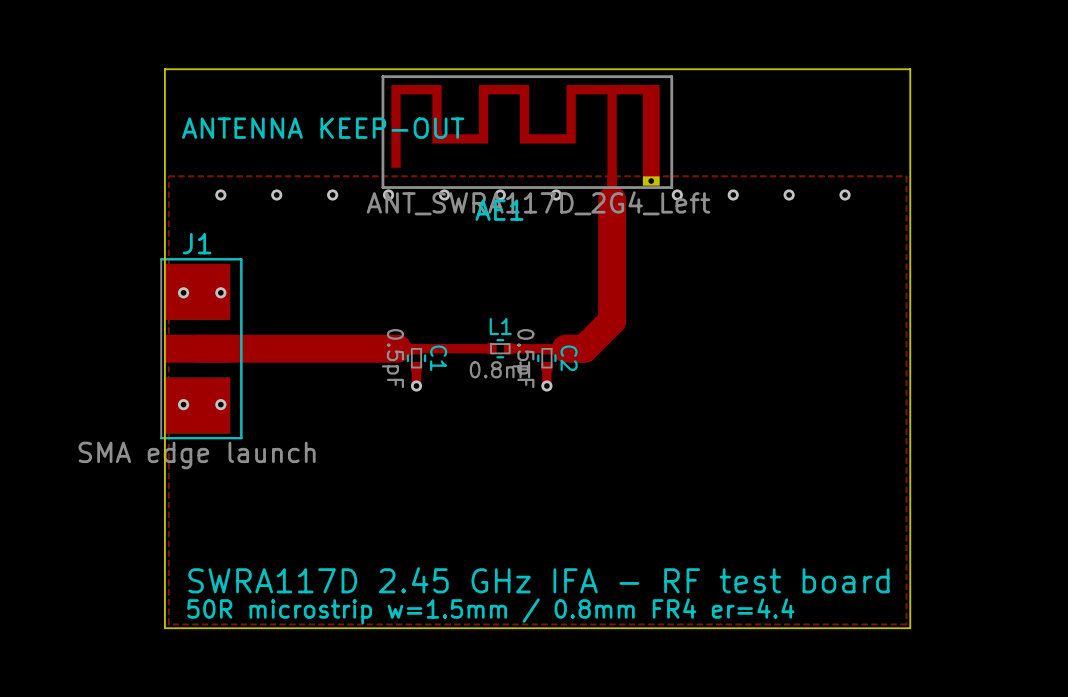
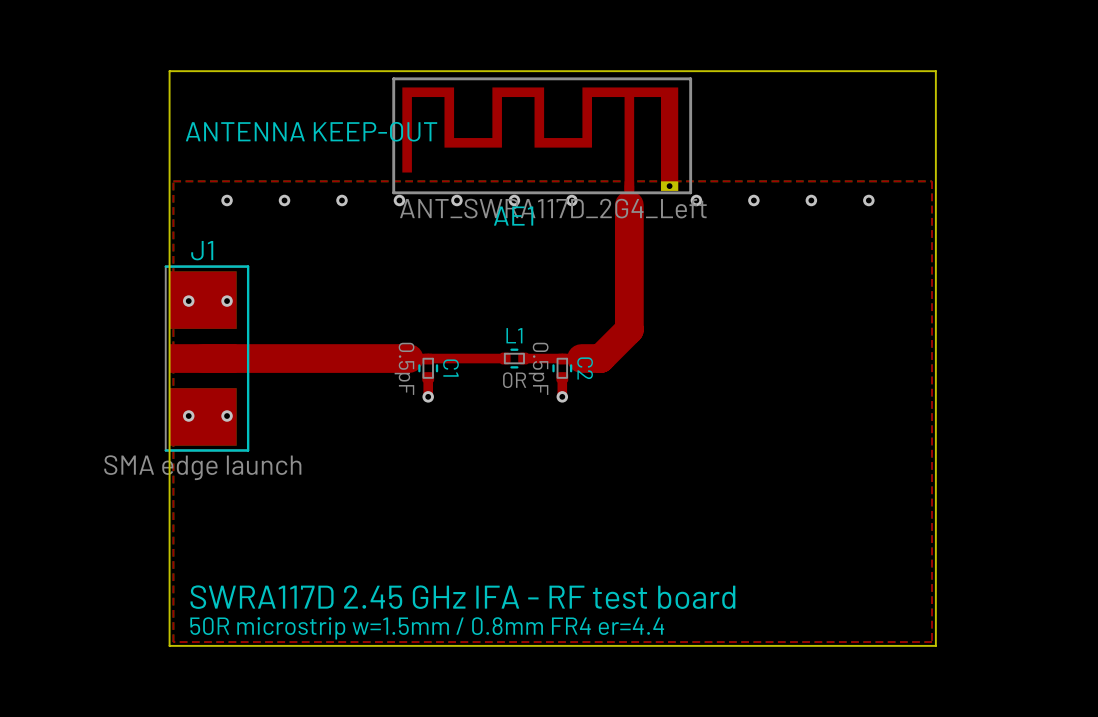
L1 value: 0.8nH (499, 369) -> 0R (514, 380)

